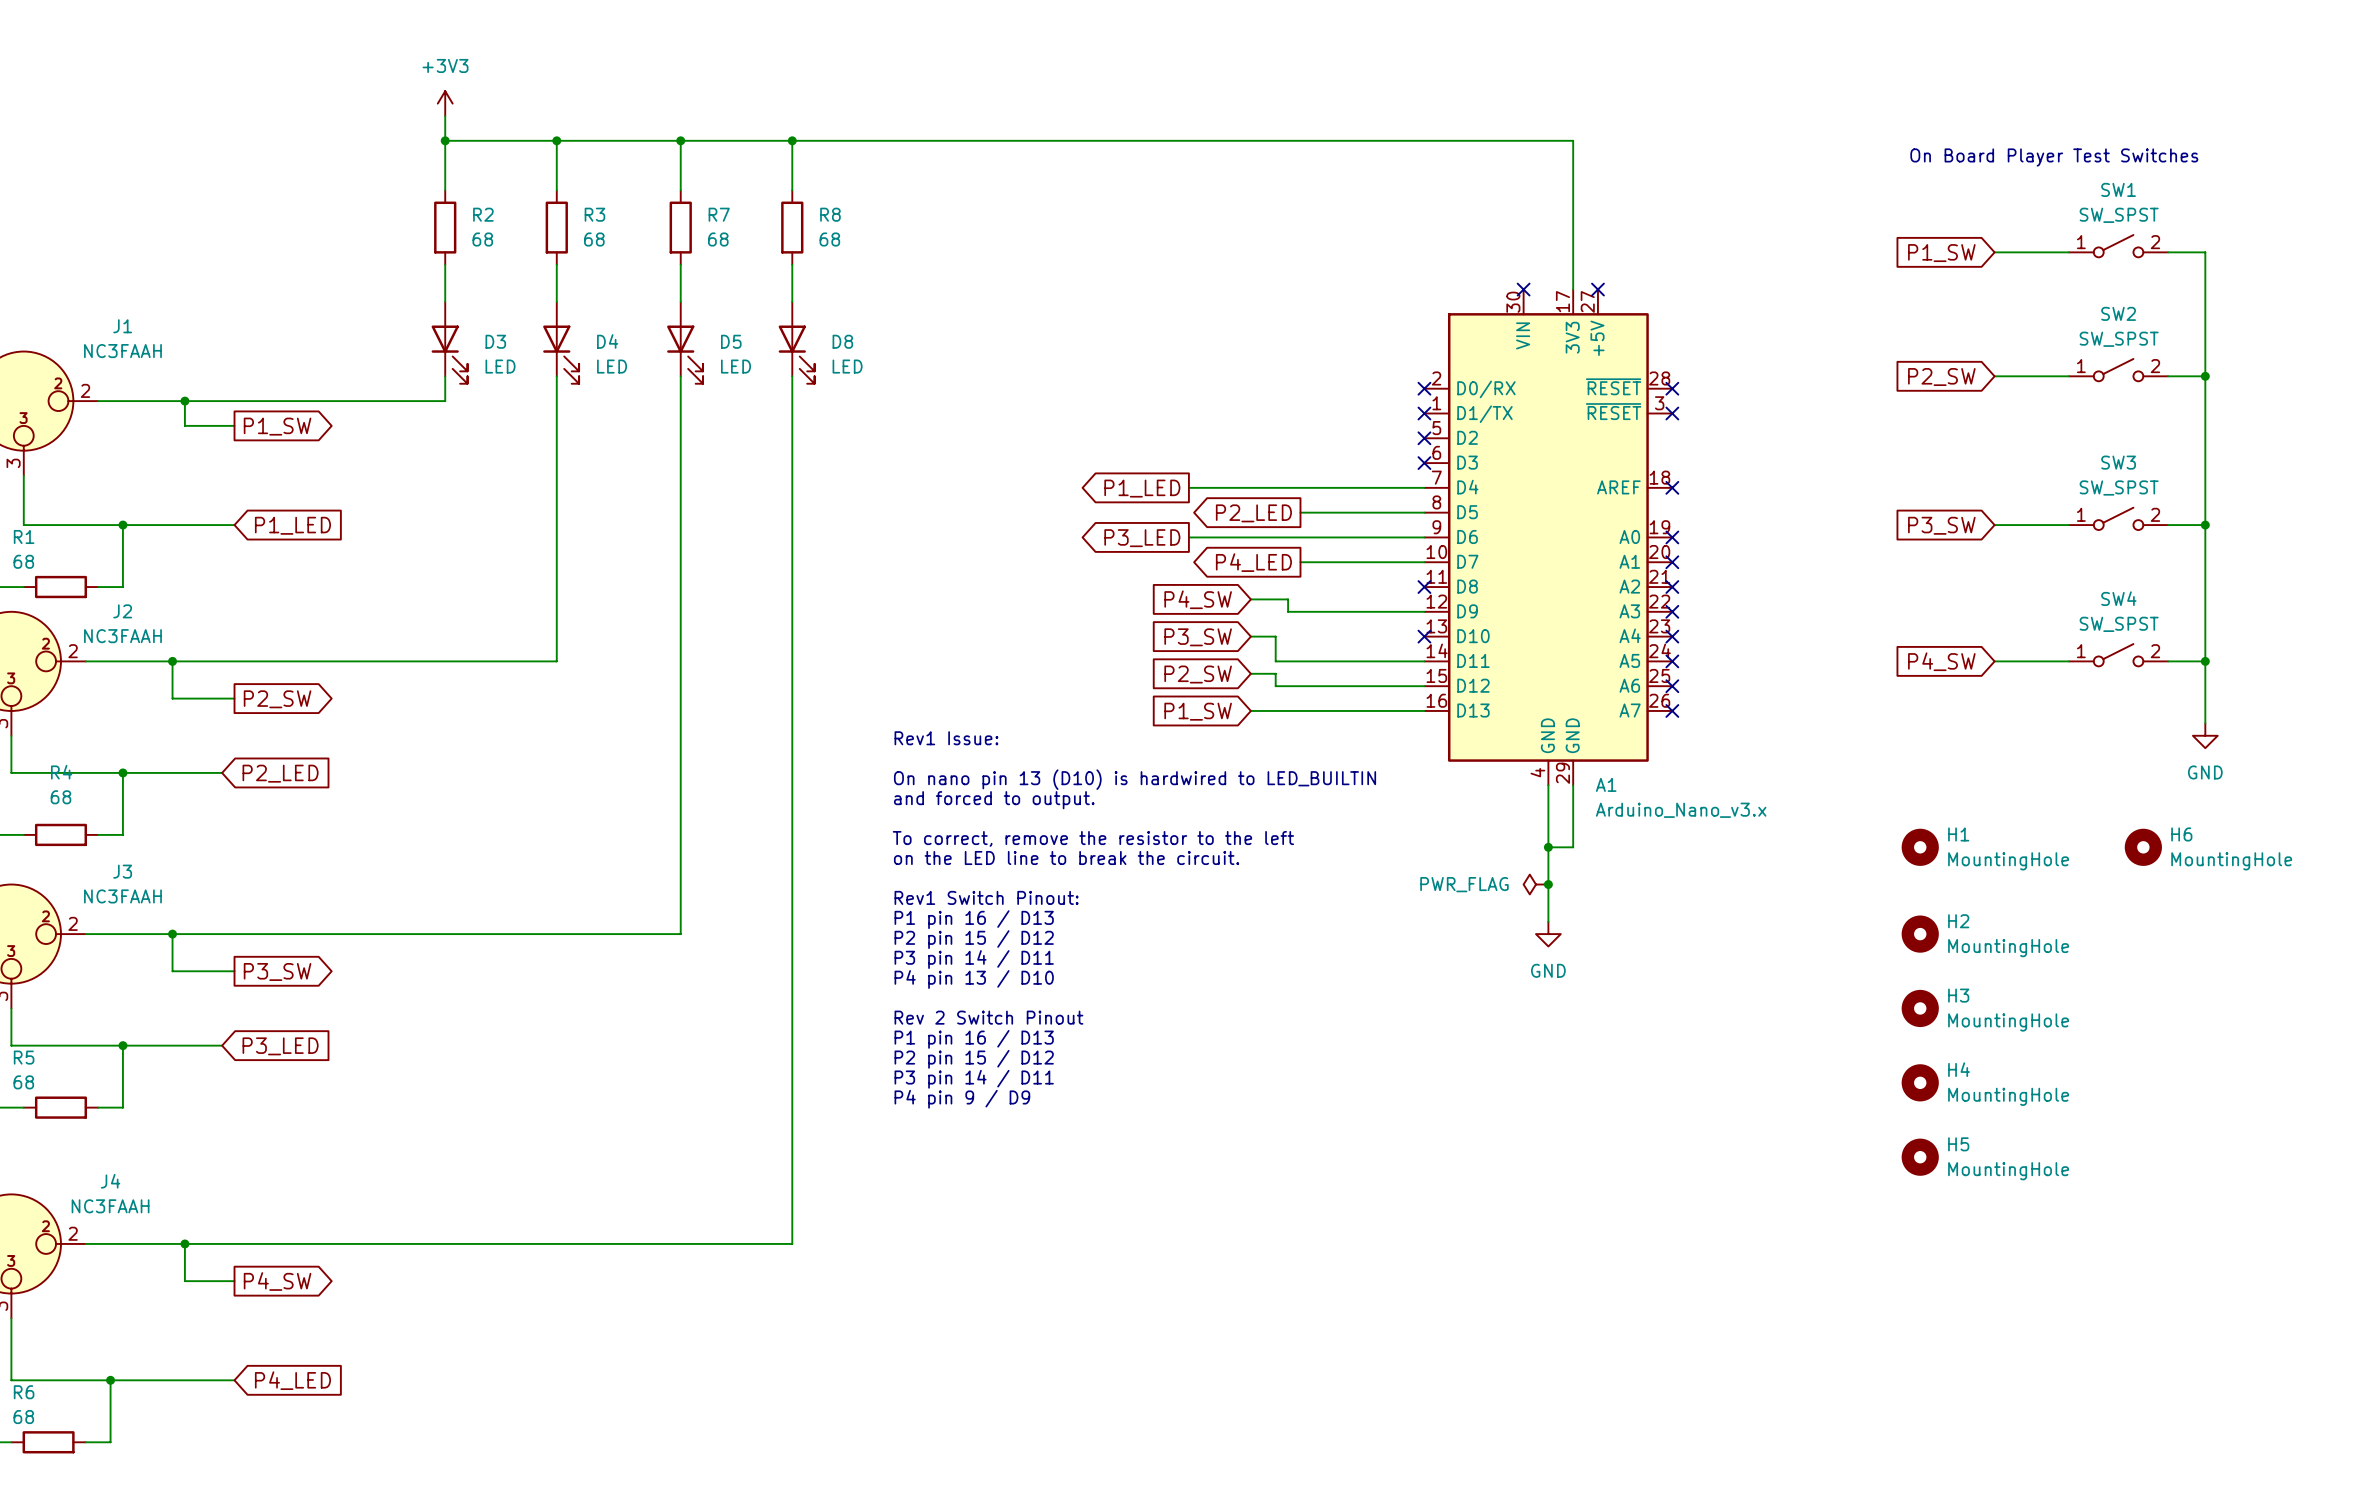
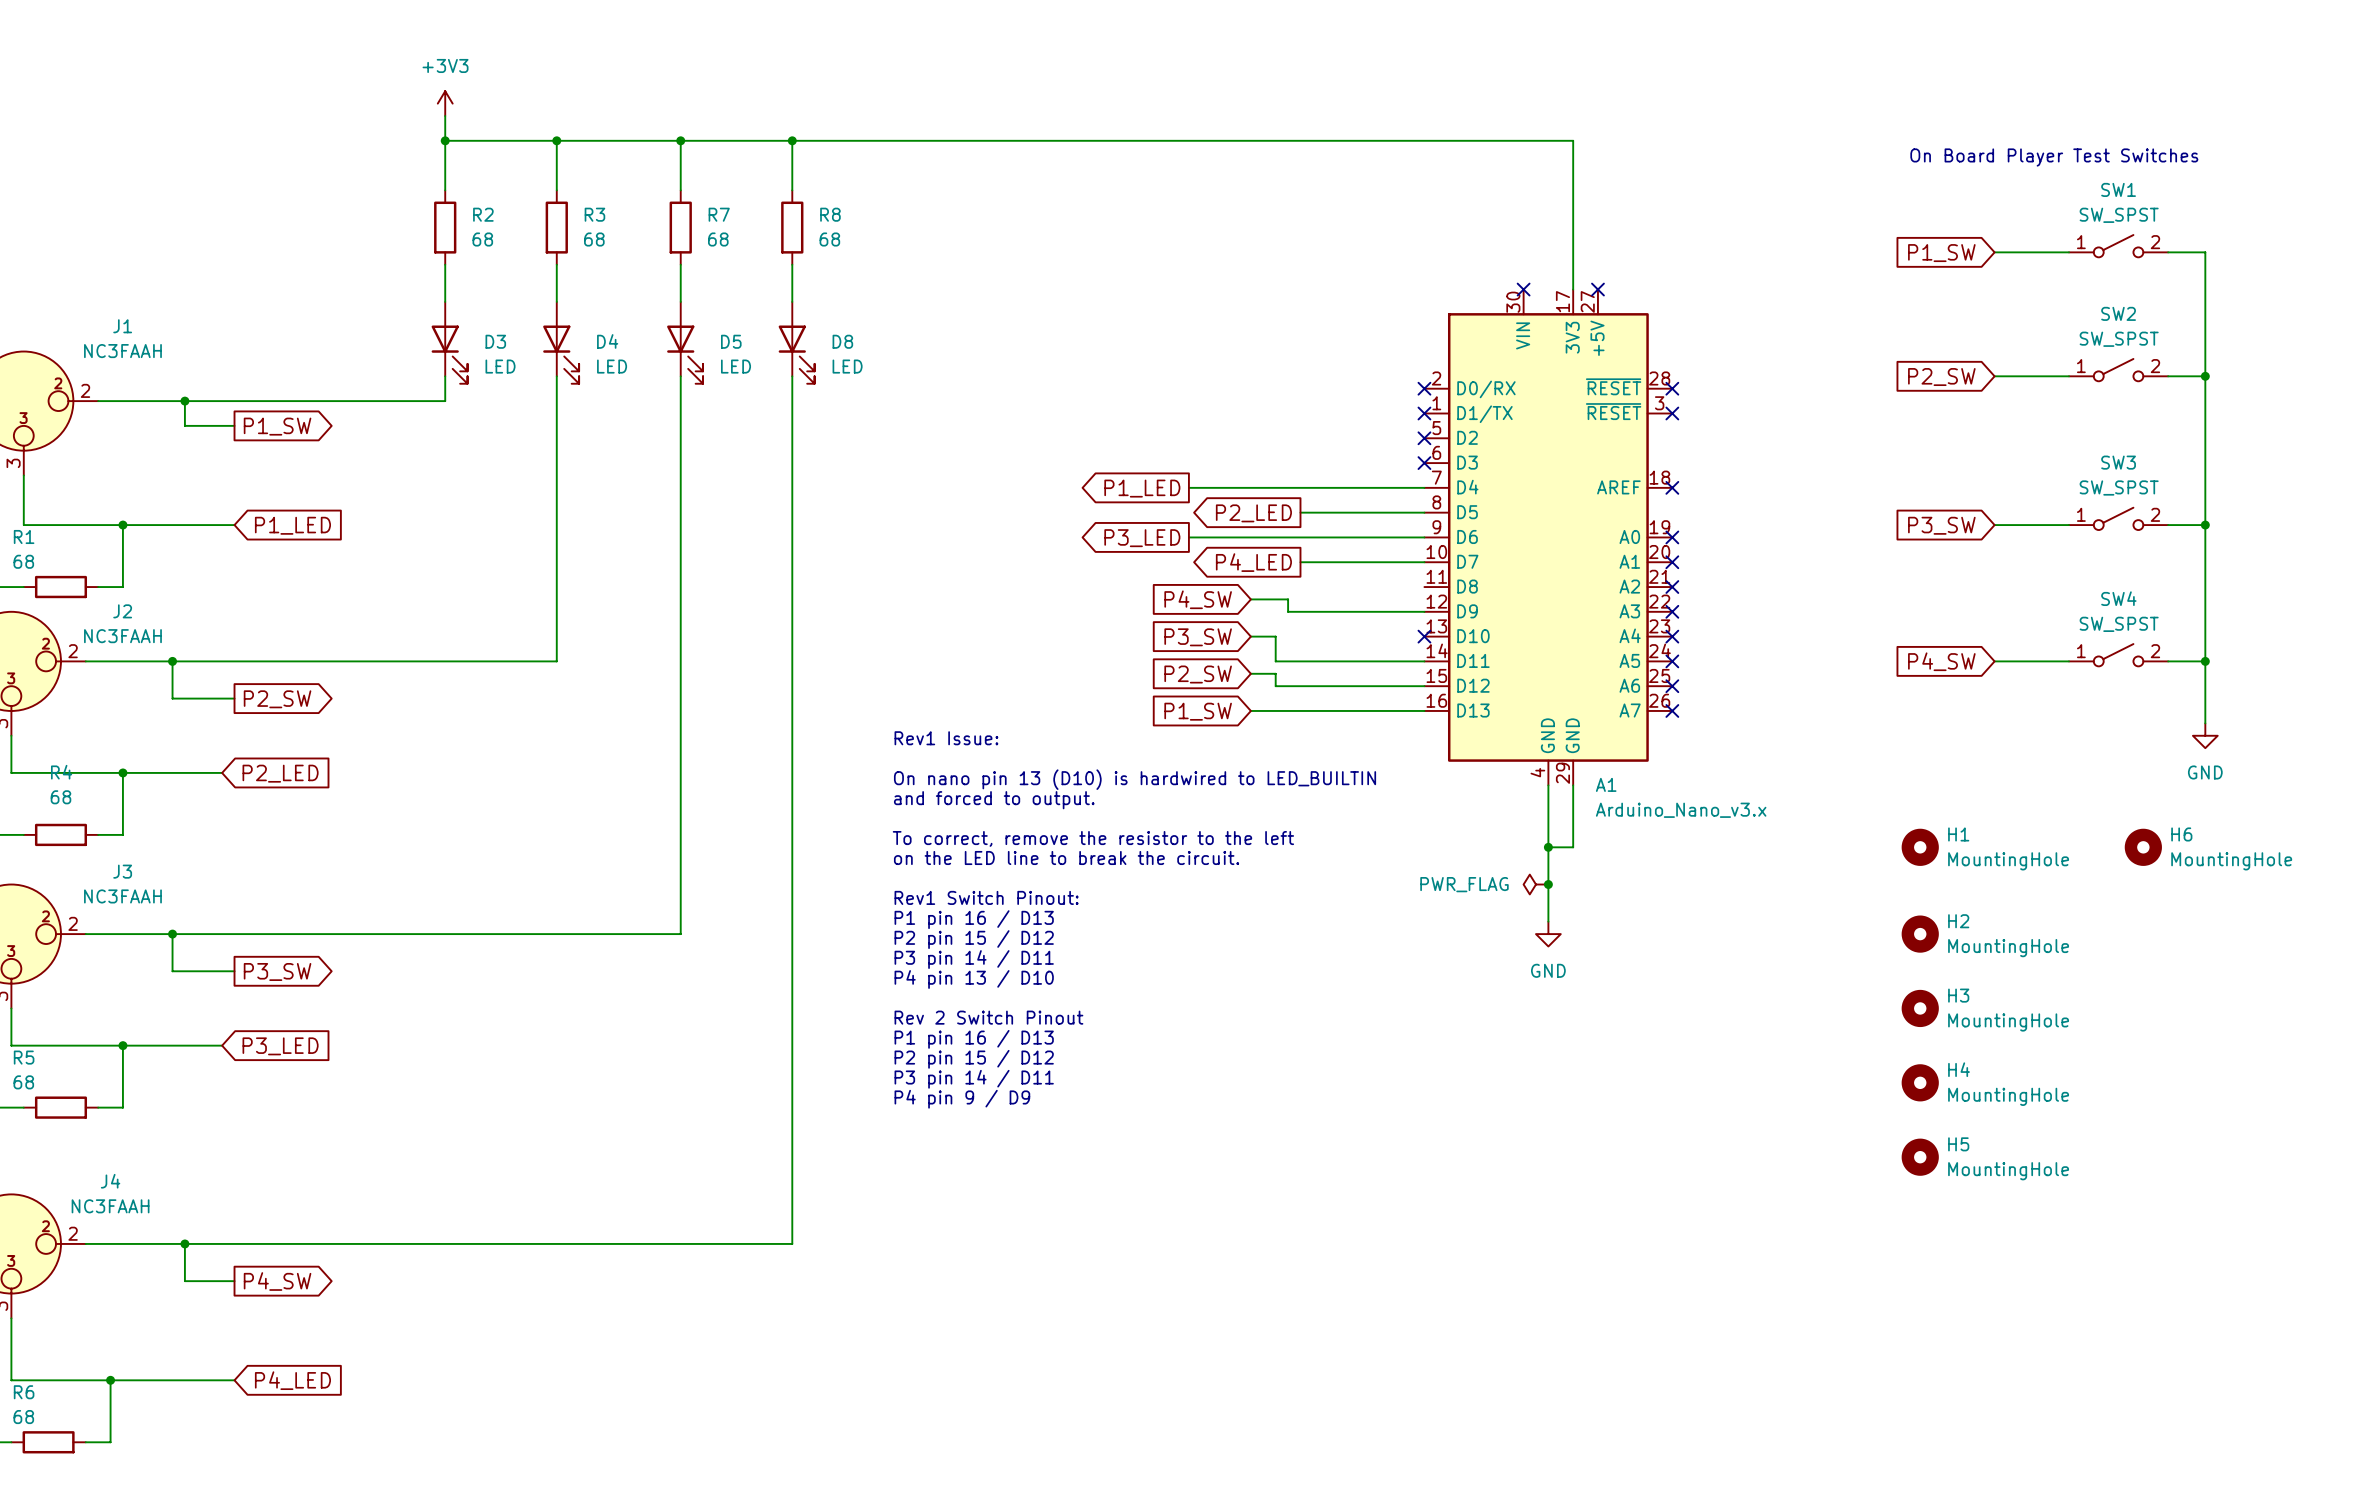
no-connect mark: (1424, 587) -> none

